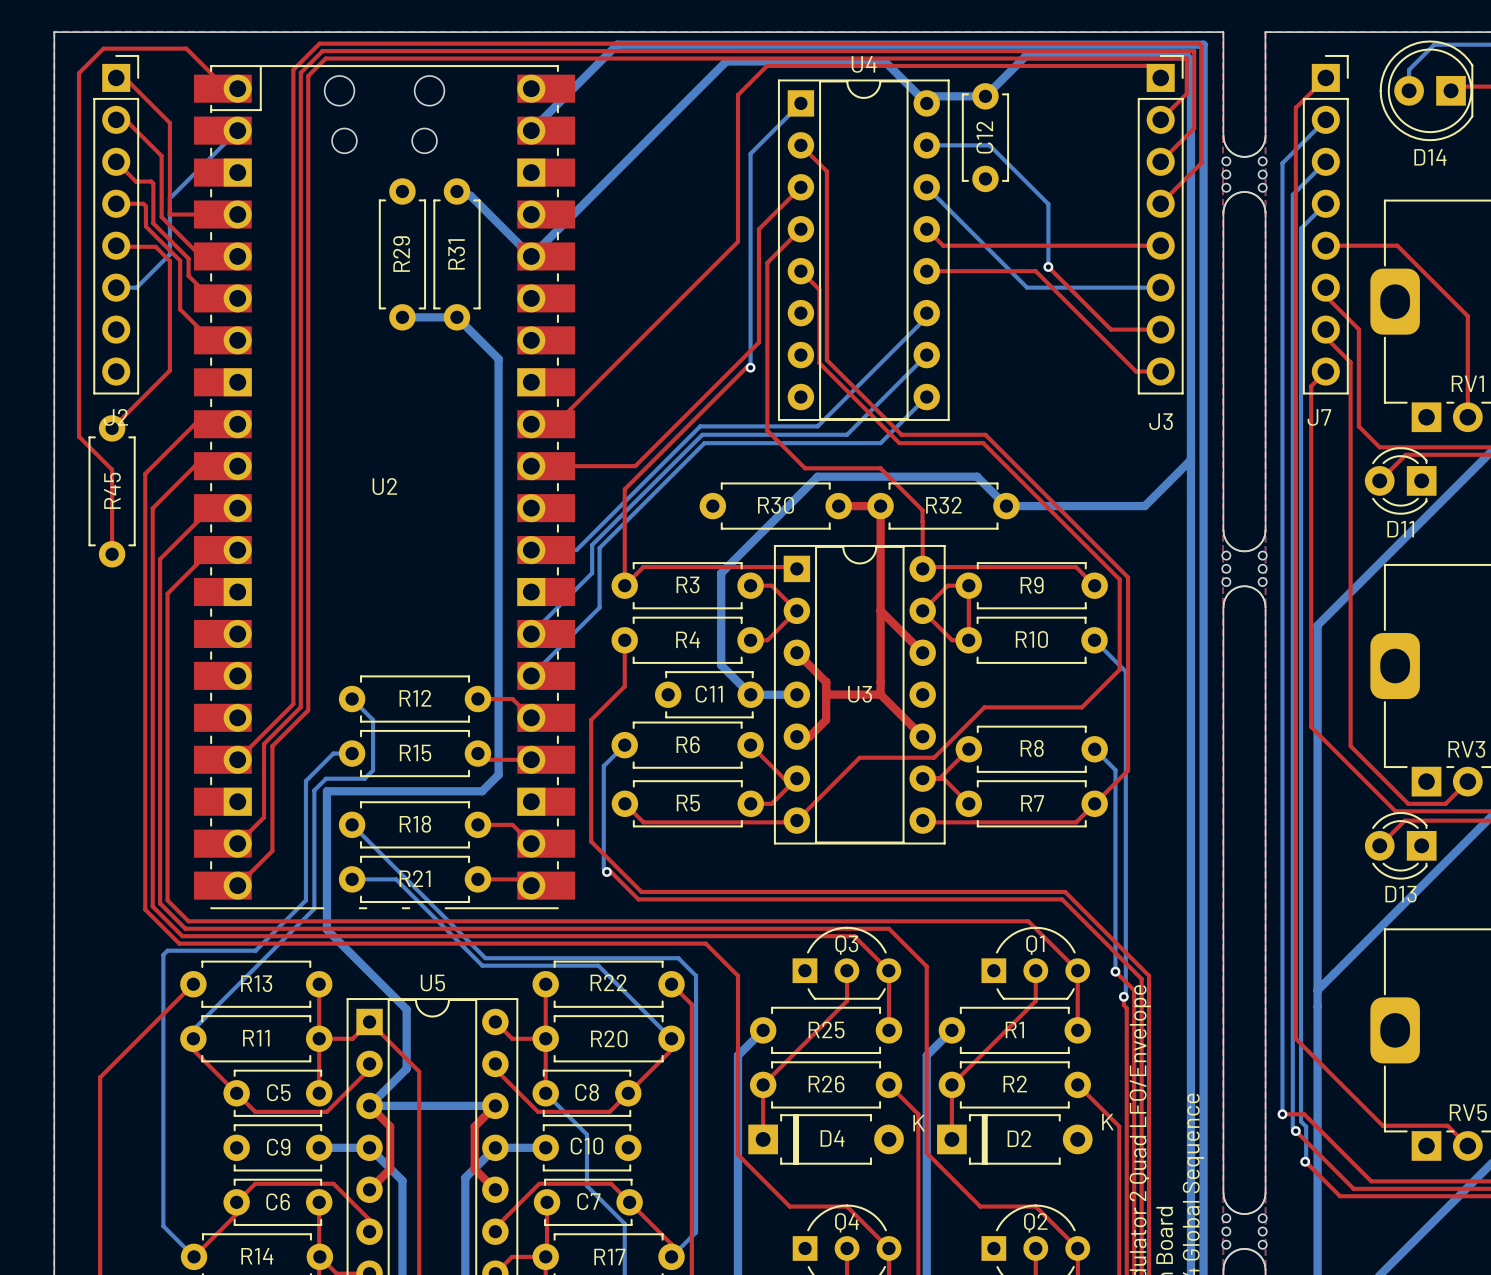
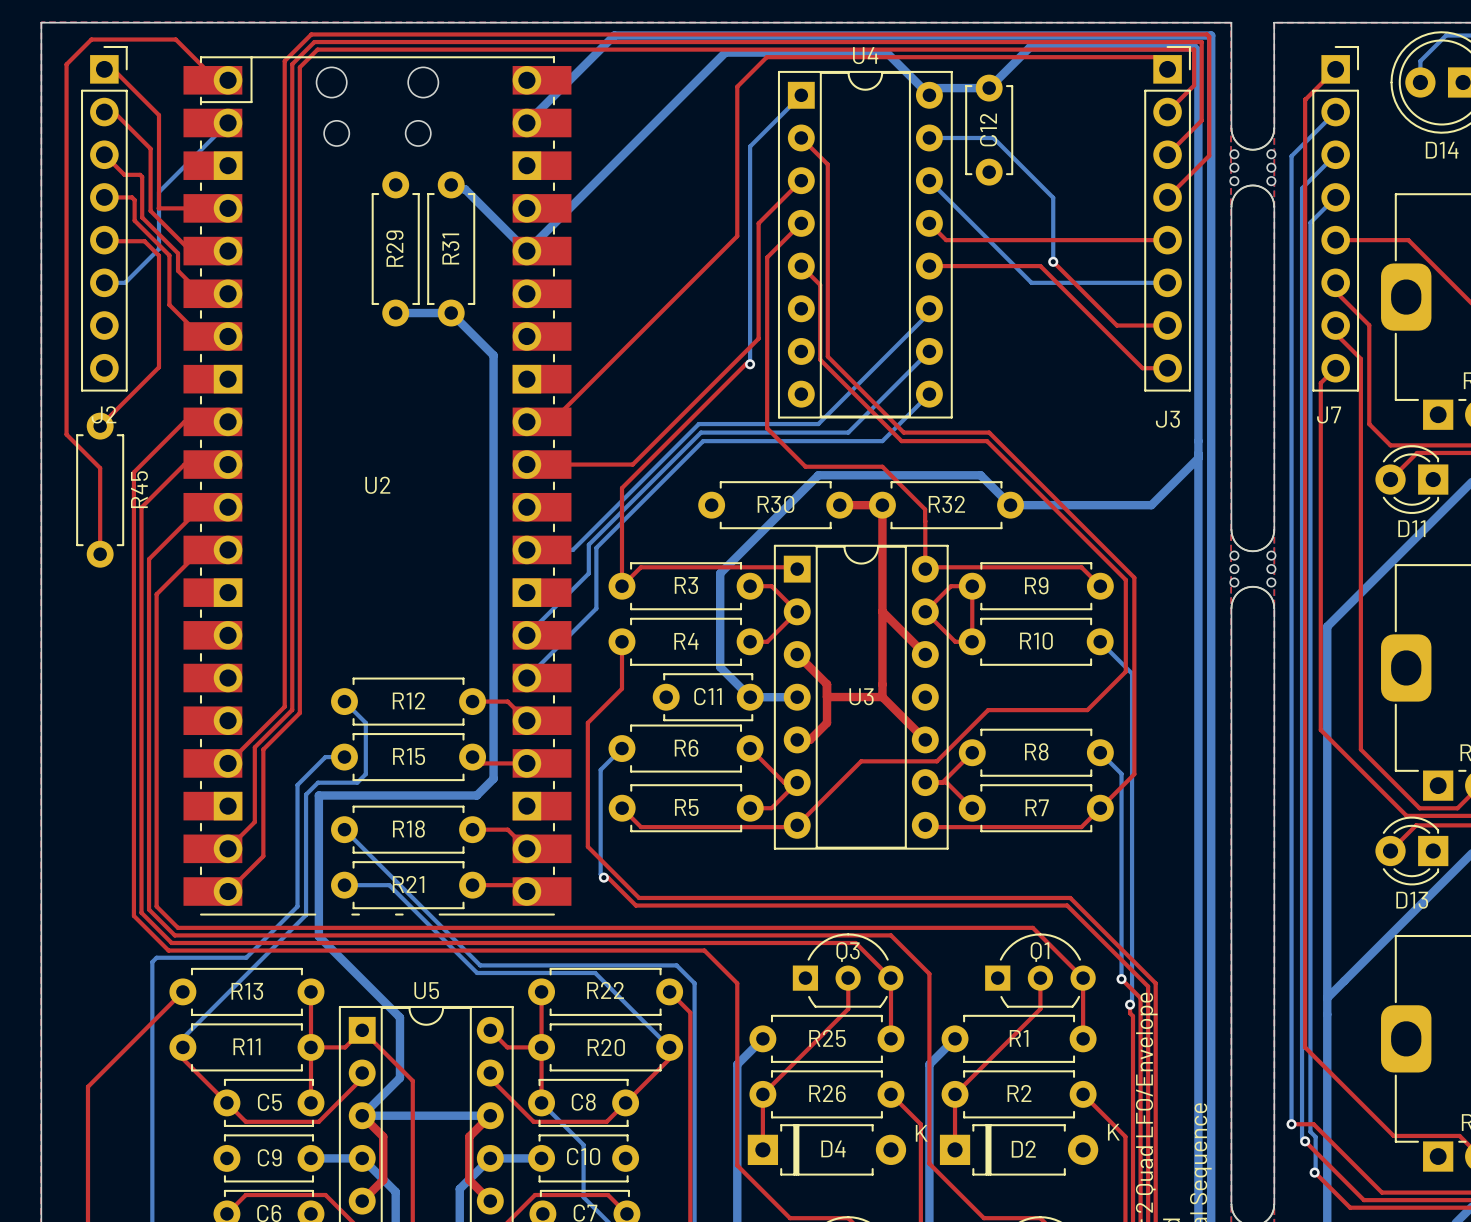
R45 name position: R45 (112, 490) -> R45 (139, 489)

